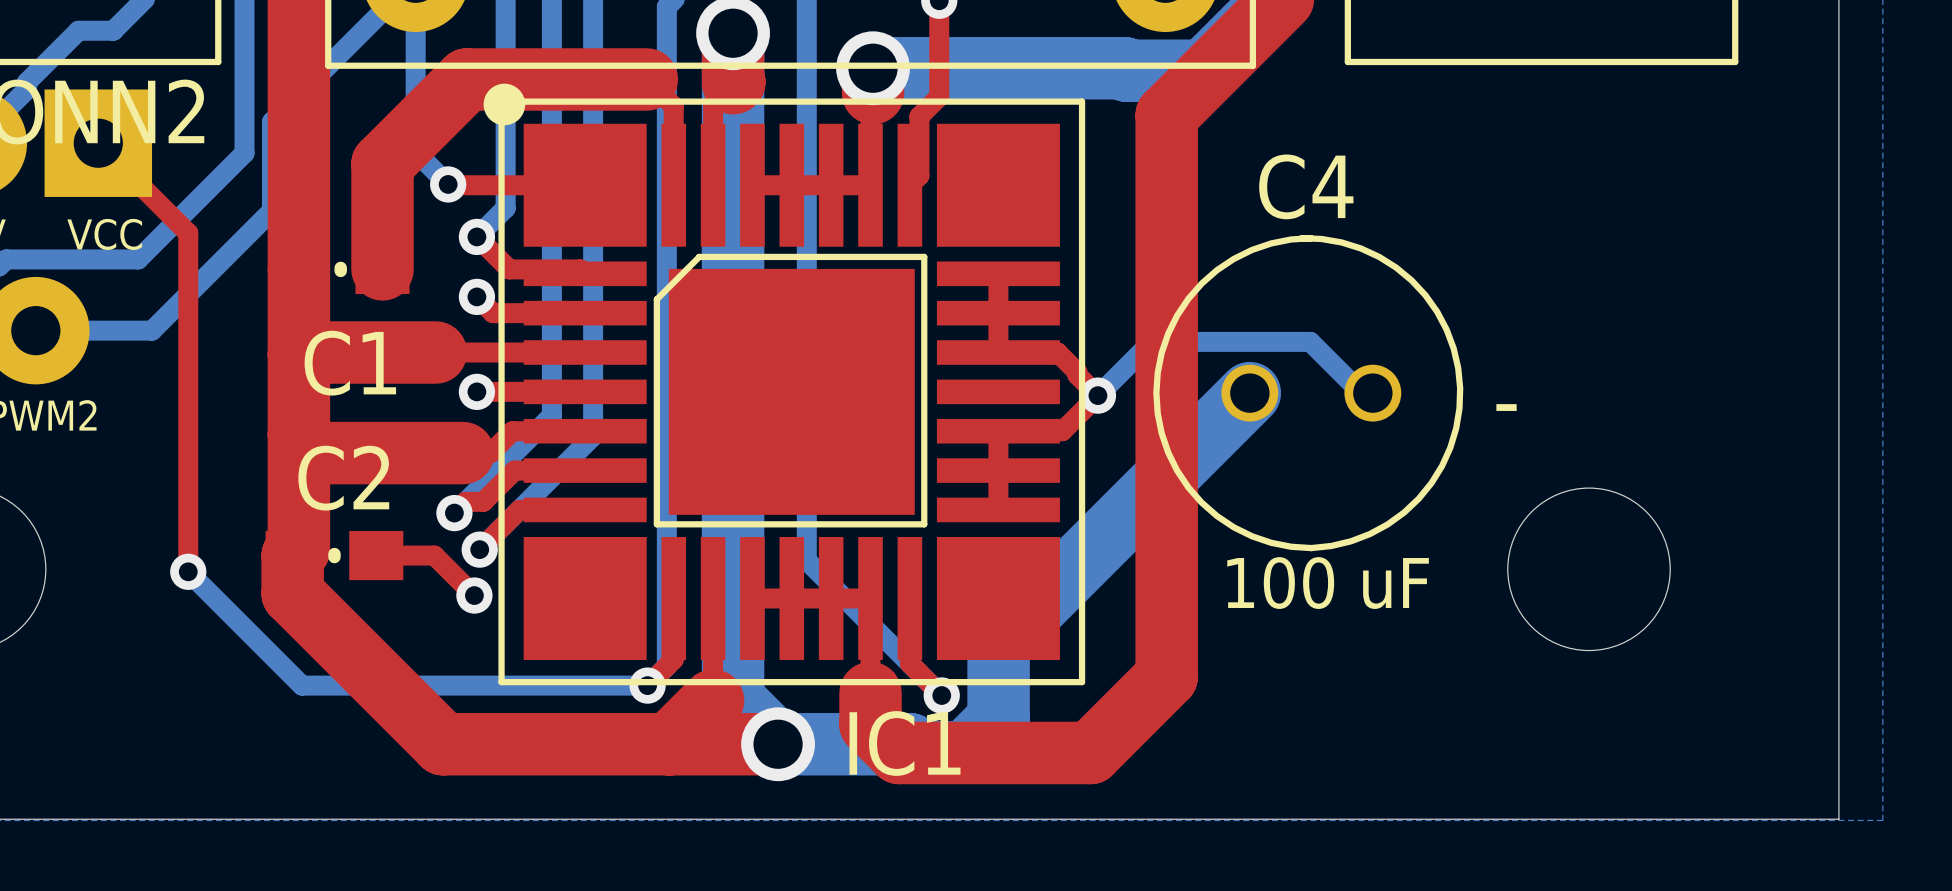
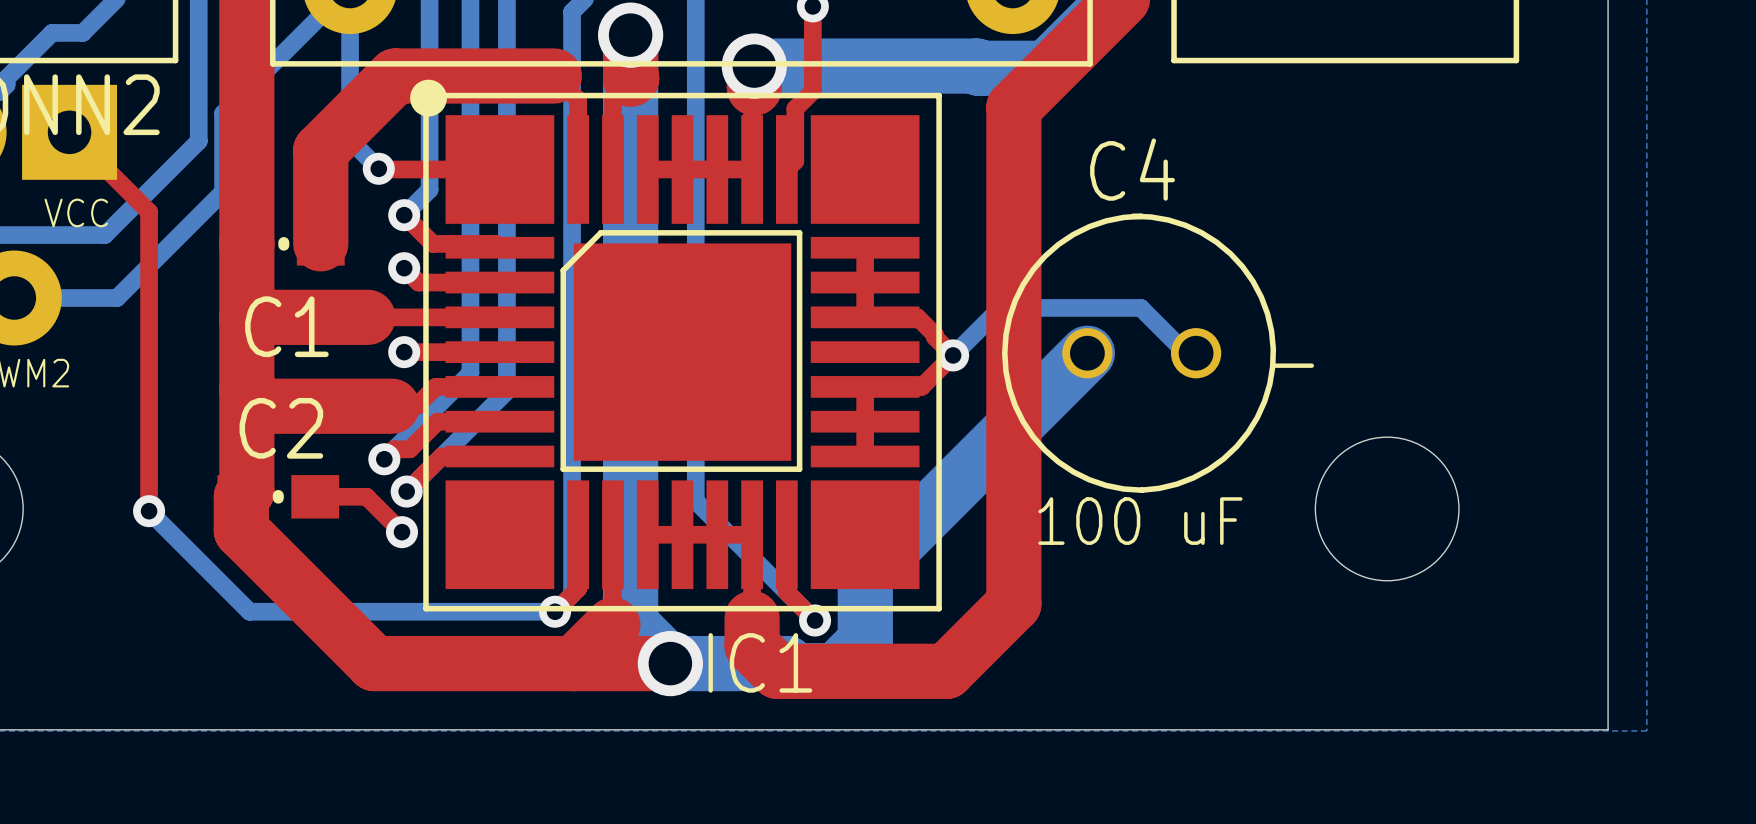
IC1 name position: IC1 (904, 743) -> IC1 (760, 662)

